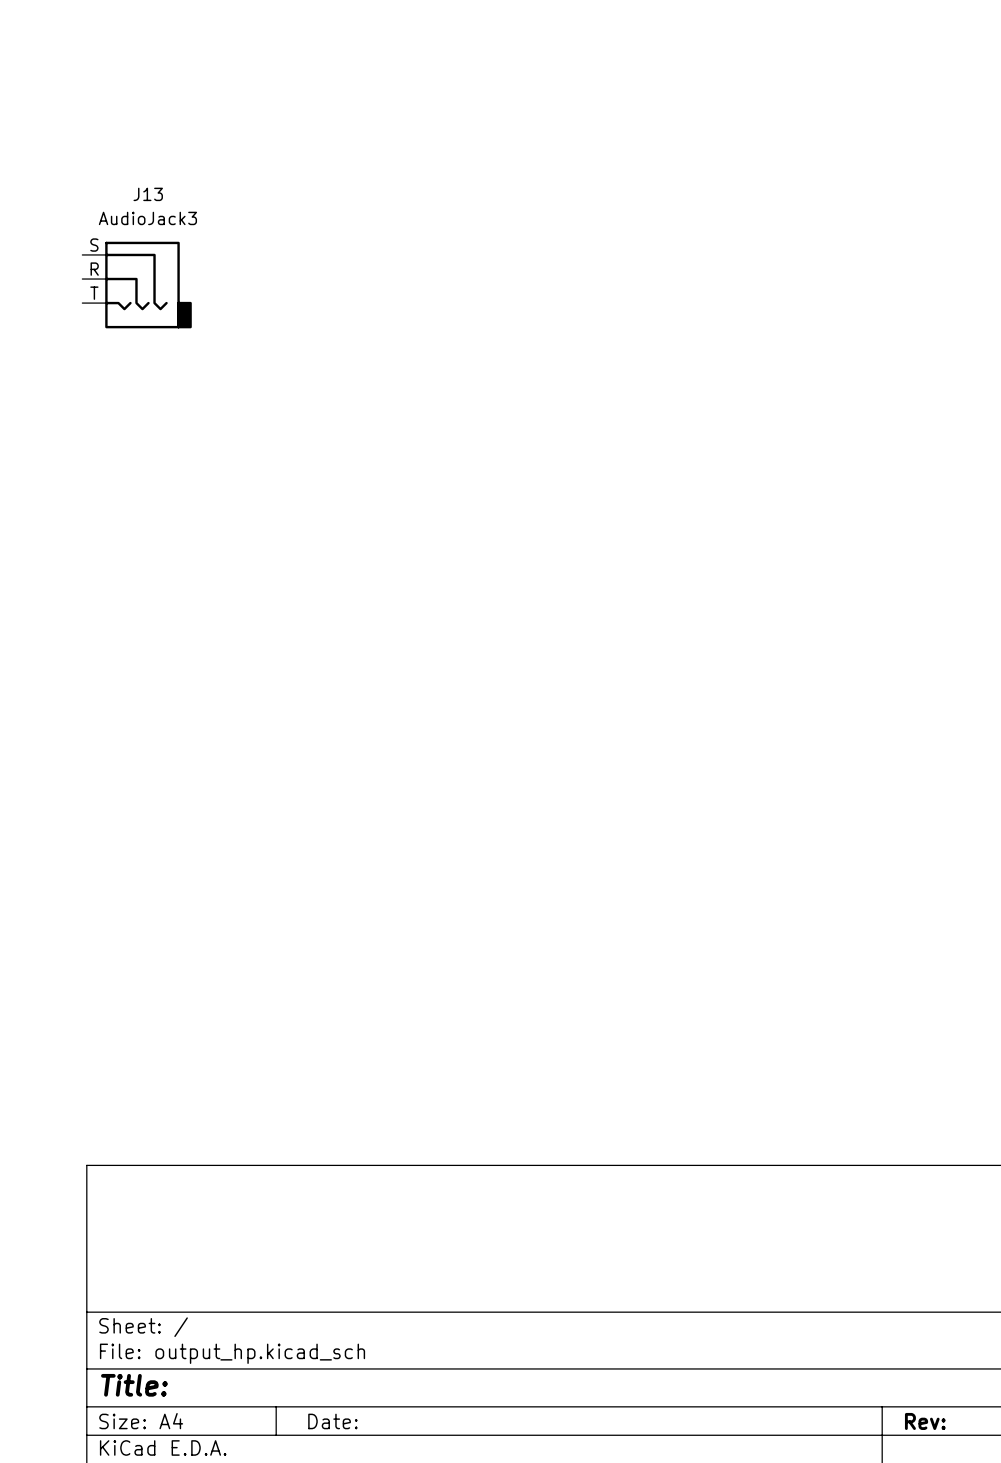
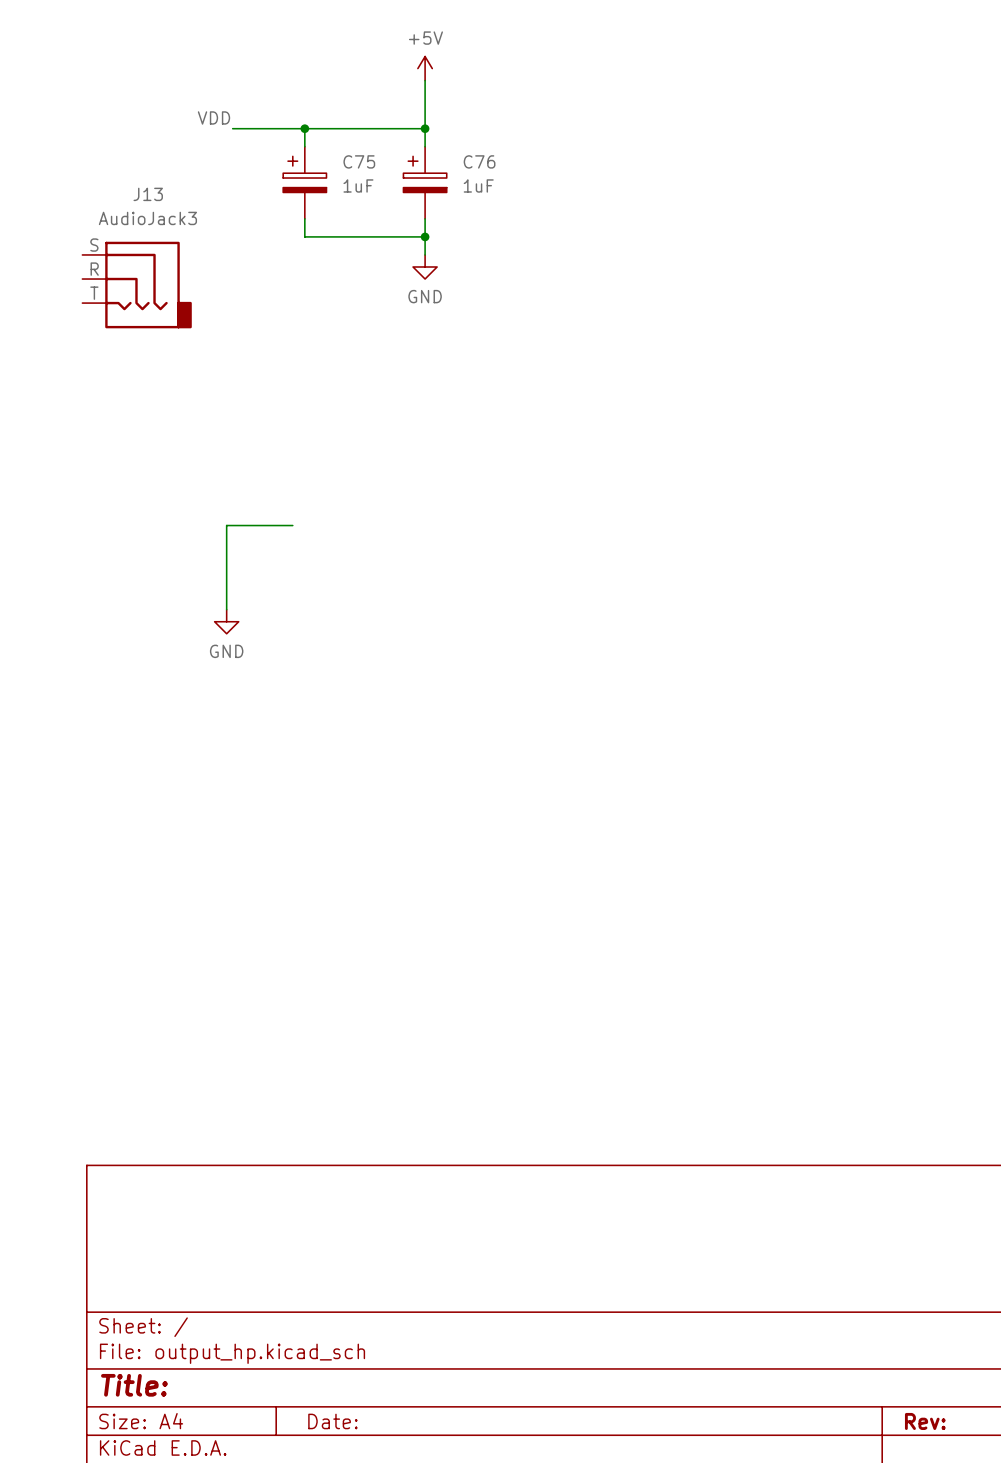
power symbol: none -> +5V (425, 68)
wire: none -> (425, 80) (425, 146)
label: none -> VDD (213, 117)
wire: none -> (232, 128) (425, 128)
wire: none -> (304, 128) (304, 146)
junction: none -> (304, 128)
junction: none -> (425, 128)
C75: none -> 1uF (304, 182)
C76: none -> 1uF (425, 182)
wire: none -> (304, 218) (304, 236) (425, 236)
wire: none -> (425, 218) (425, 254)
junction: none -> (425, 236)
power symbol: none -> GND (425, 266)
wire: none -> (292, 525) (226, 525) (226, 609)
power symbol: none -> GND (226, 621)

